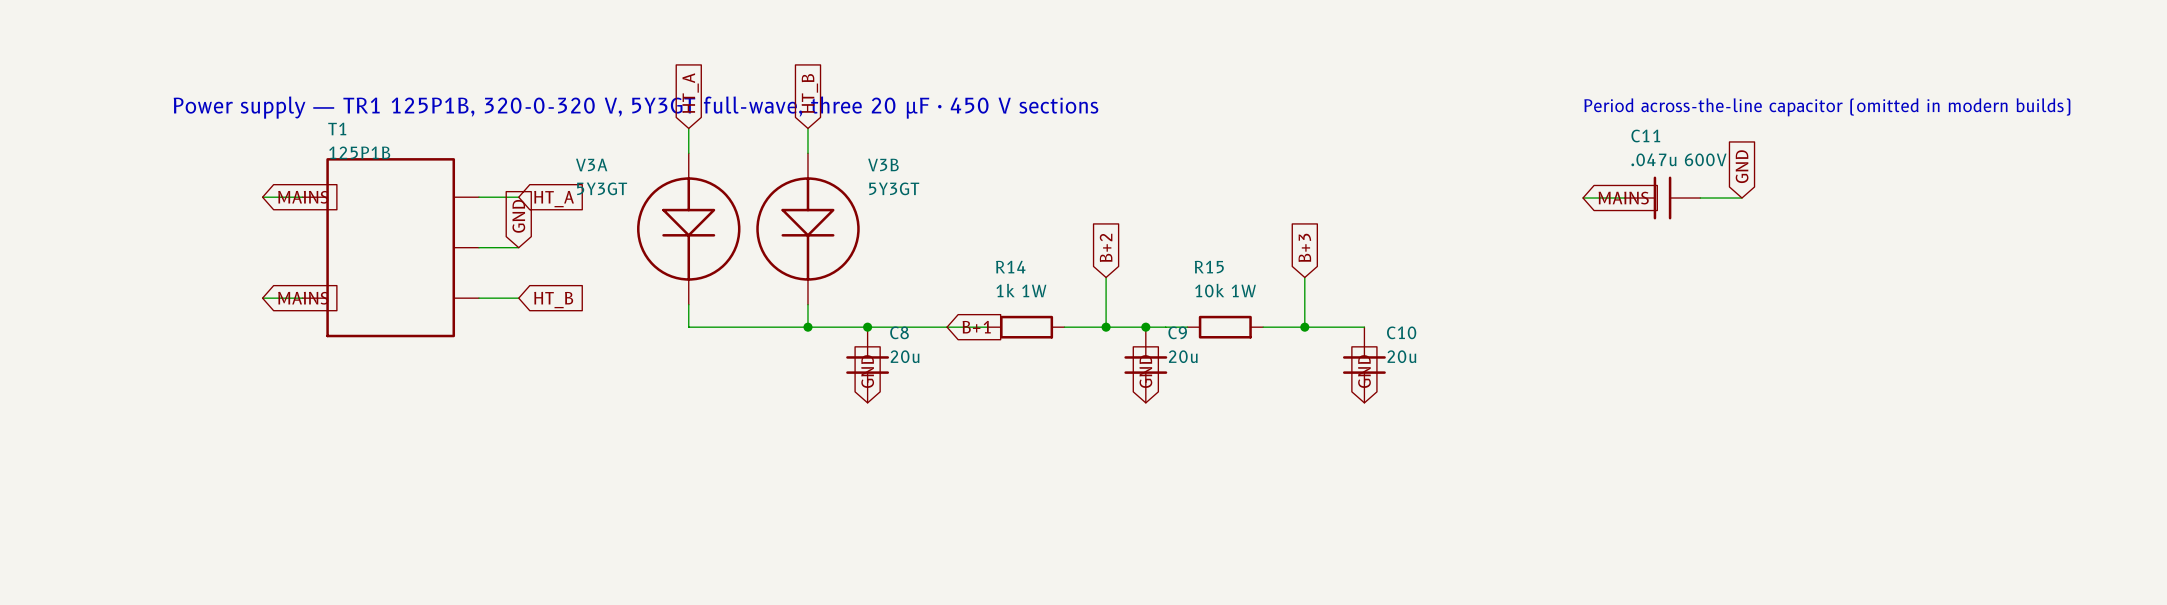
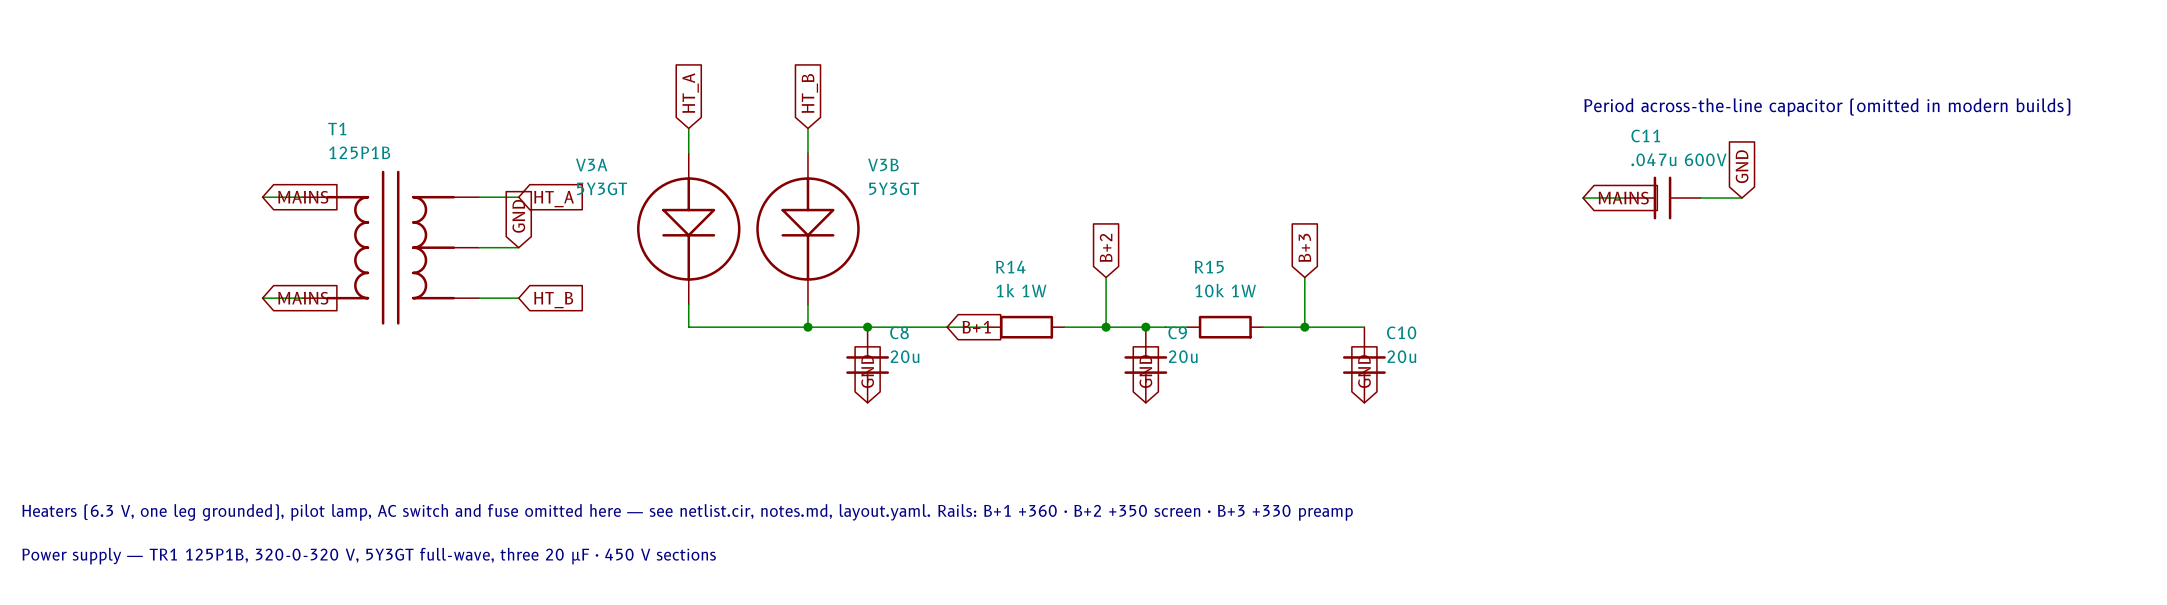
text: Power supply — TR1 125P1B, 320-0-320 V, 5Y3GT full-wave, three 20 µF · 450 V sections (635, 107) -> none
T1 symbol: [302, 158, 480, 338] -> [302, 170, 479, 325]
text: none -> Heaters (6.3 V, one leg grounded), pilot lamp, AC switch and fuse omitted here — see netlist.cir, notes.md, layout.yaml. Rails: B+1 +360 · B+2 +350 screen · B+3 +330 preamp (687, 512)
text: none -> Power supply — TR1 125P1B, 320-0-320 V, 5Y3GT full-wave, three 20 µF · 450 V sections (369, 556)

